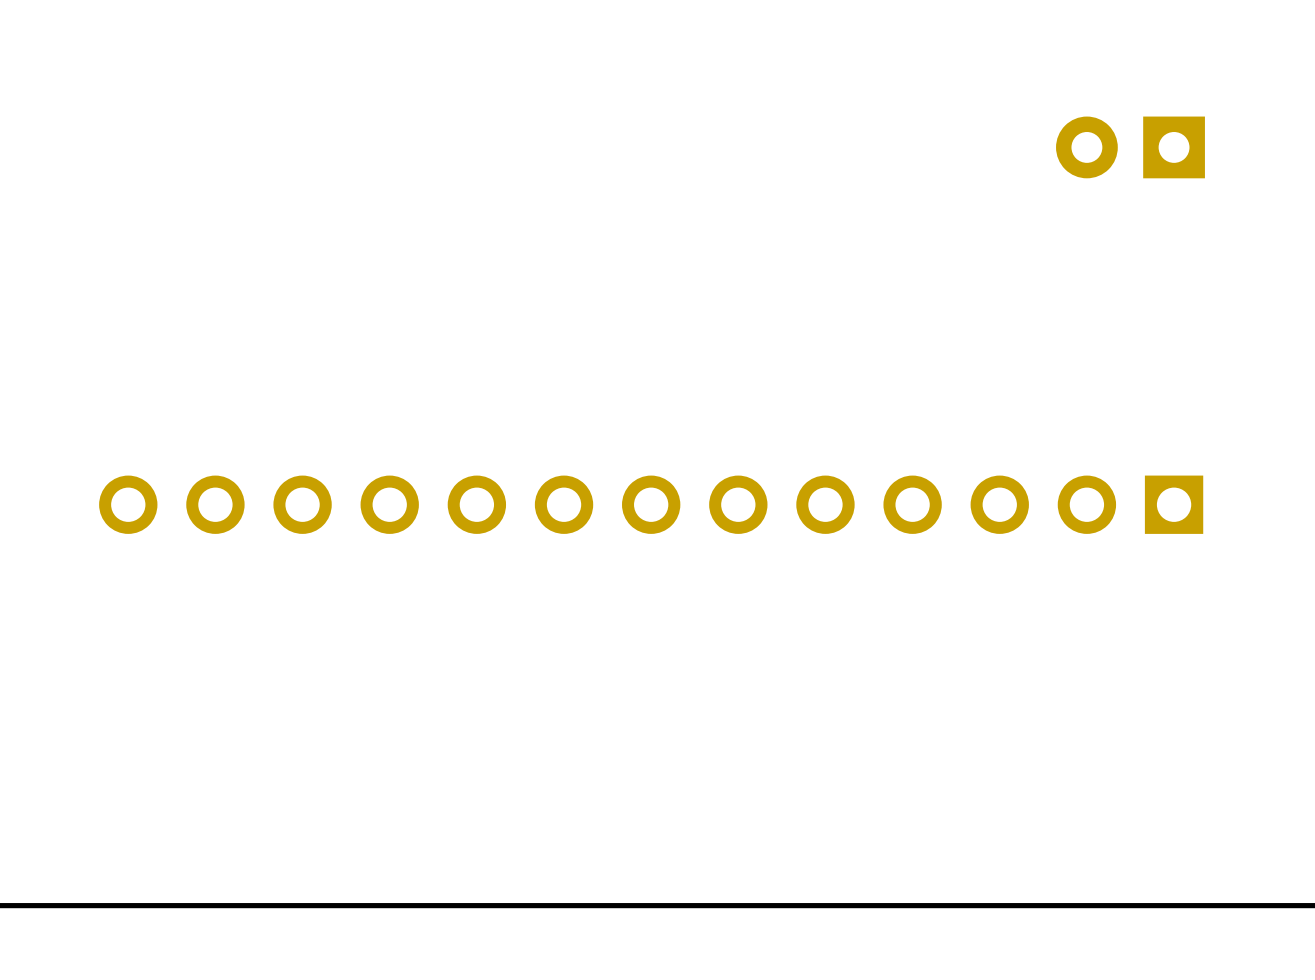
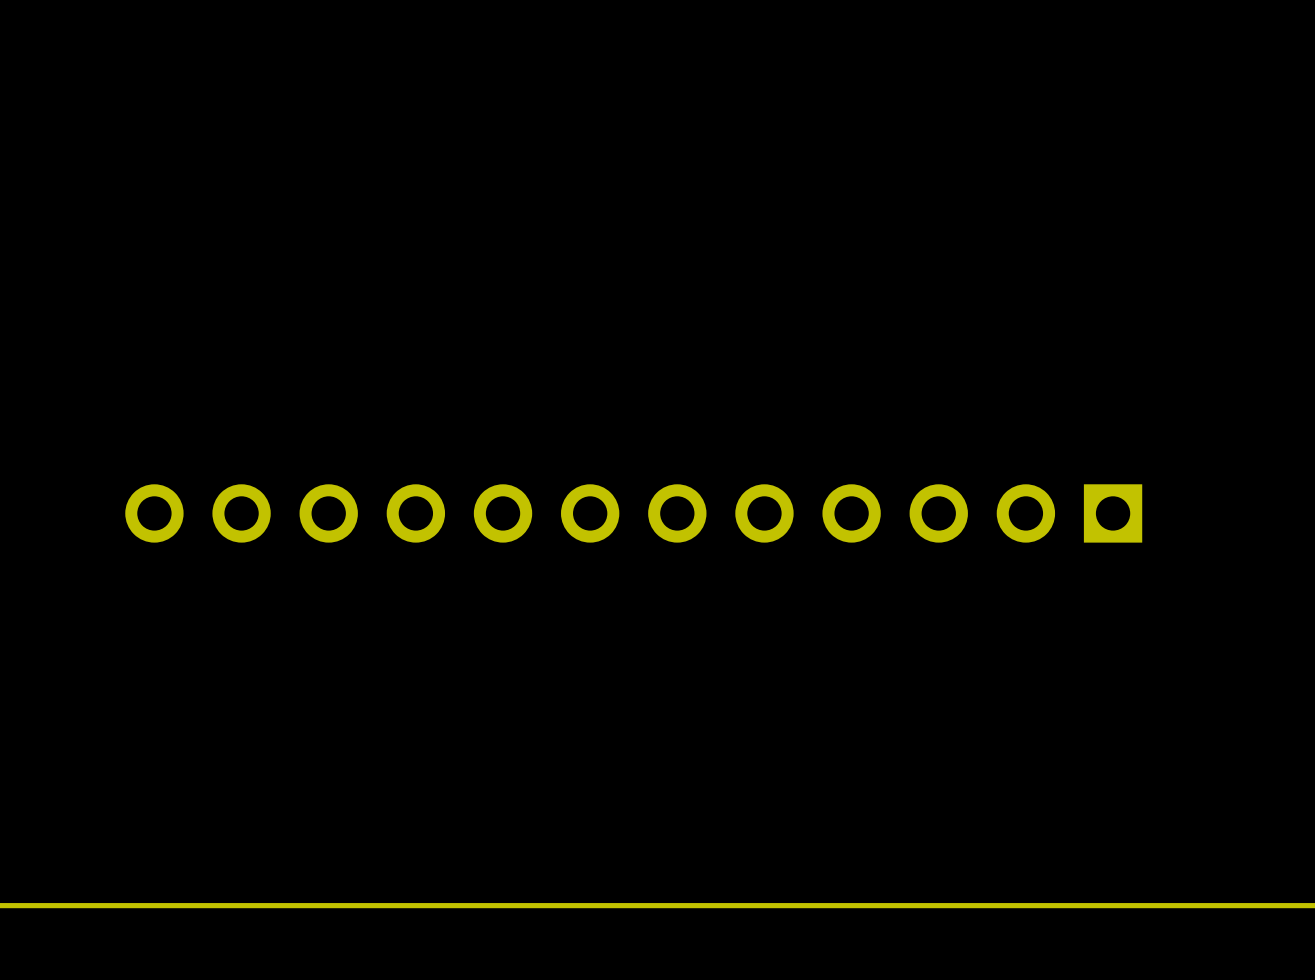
part: (1130, 147) -> none
part footprint: [99, 475, 1204, 534] -> [125, 484, 1143, 543]

